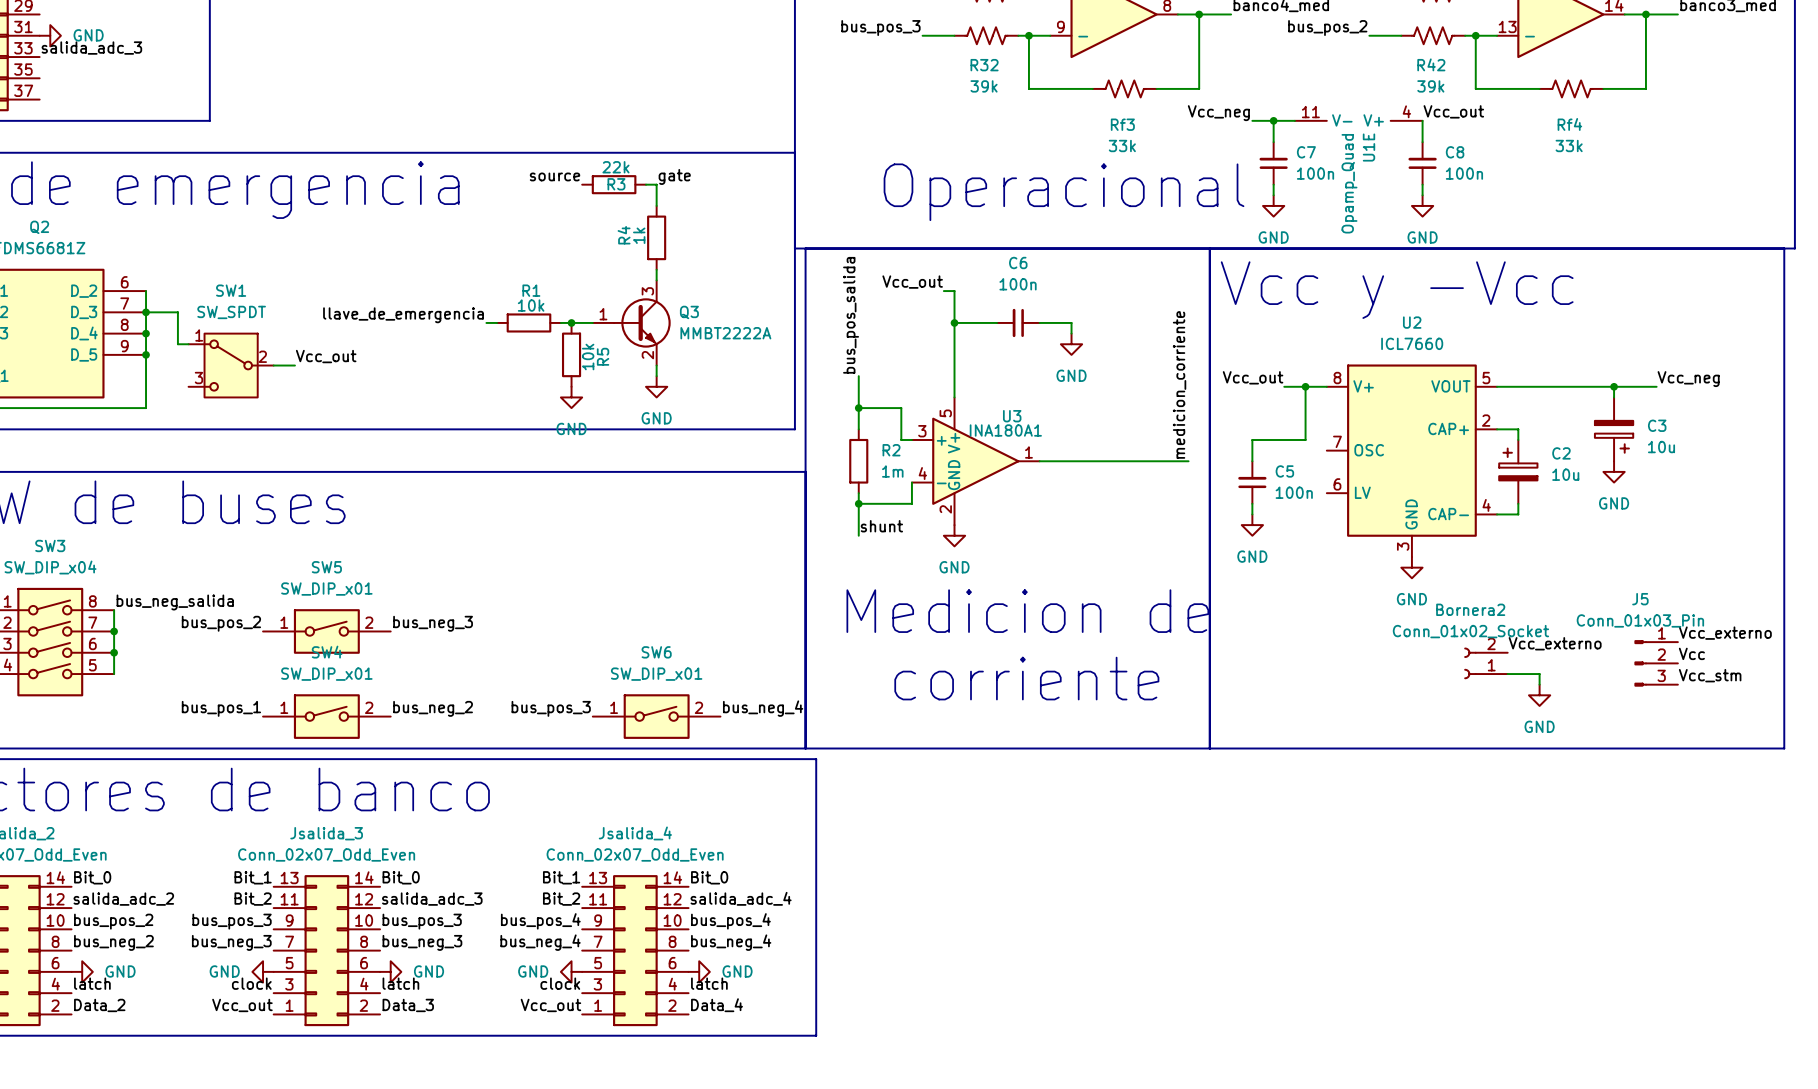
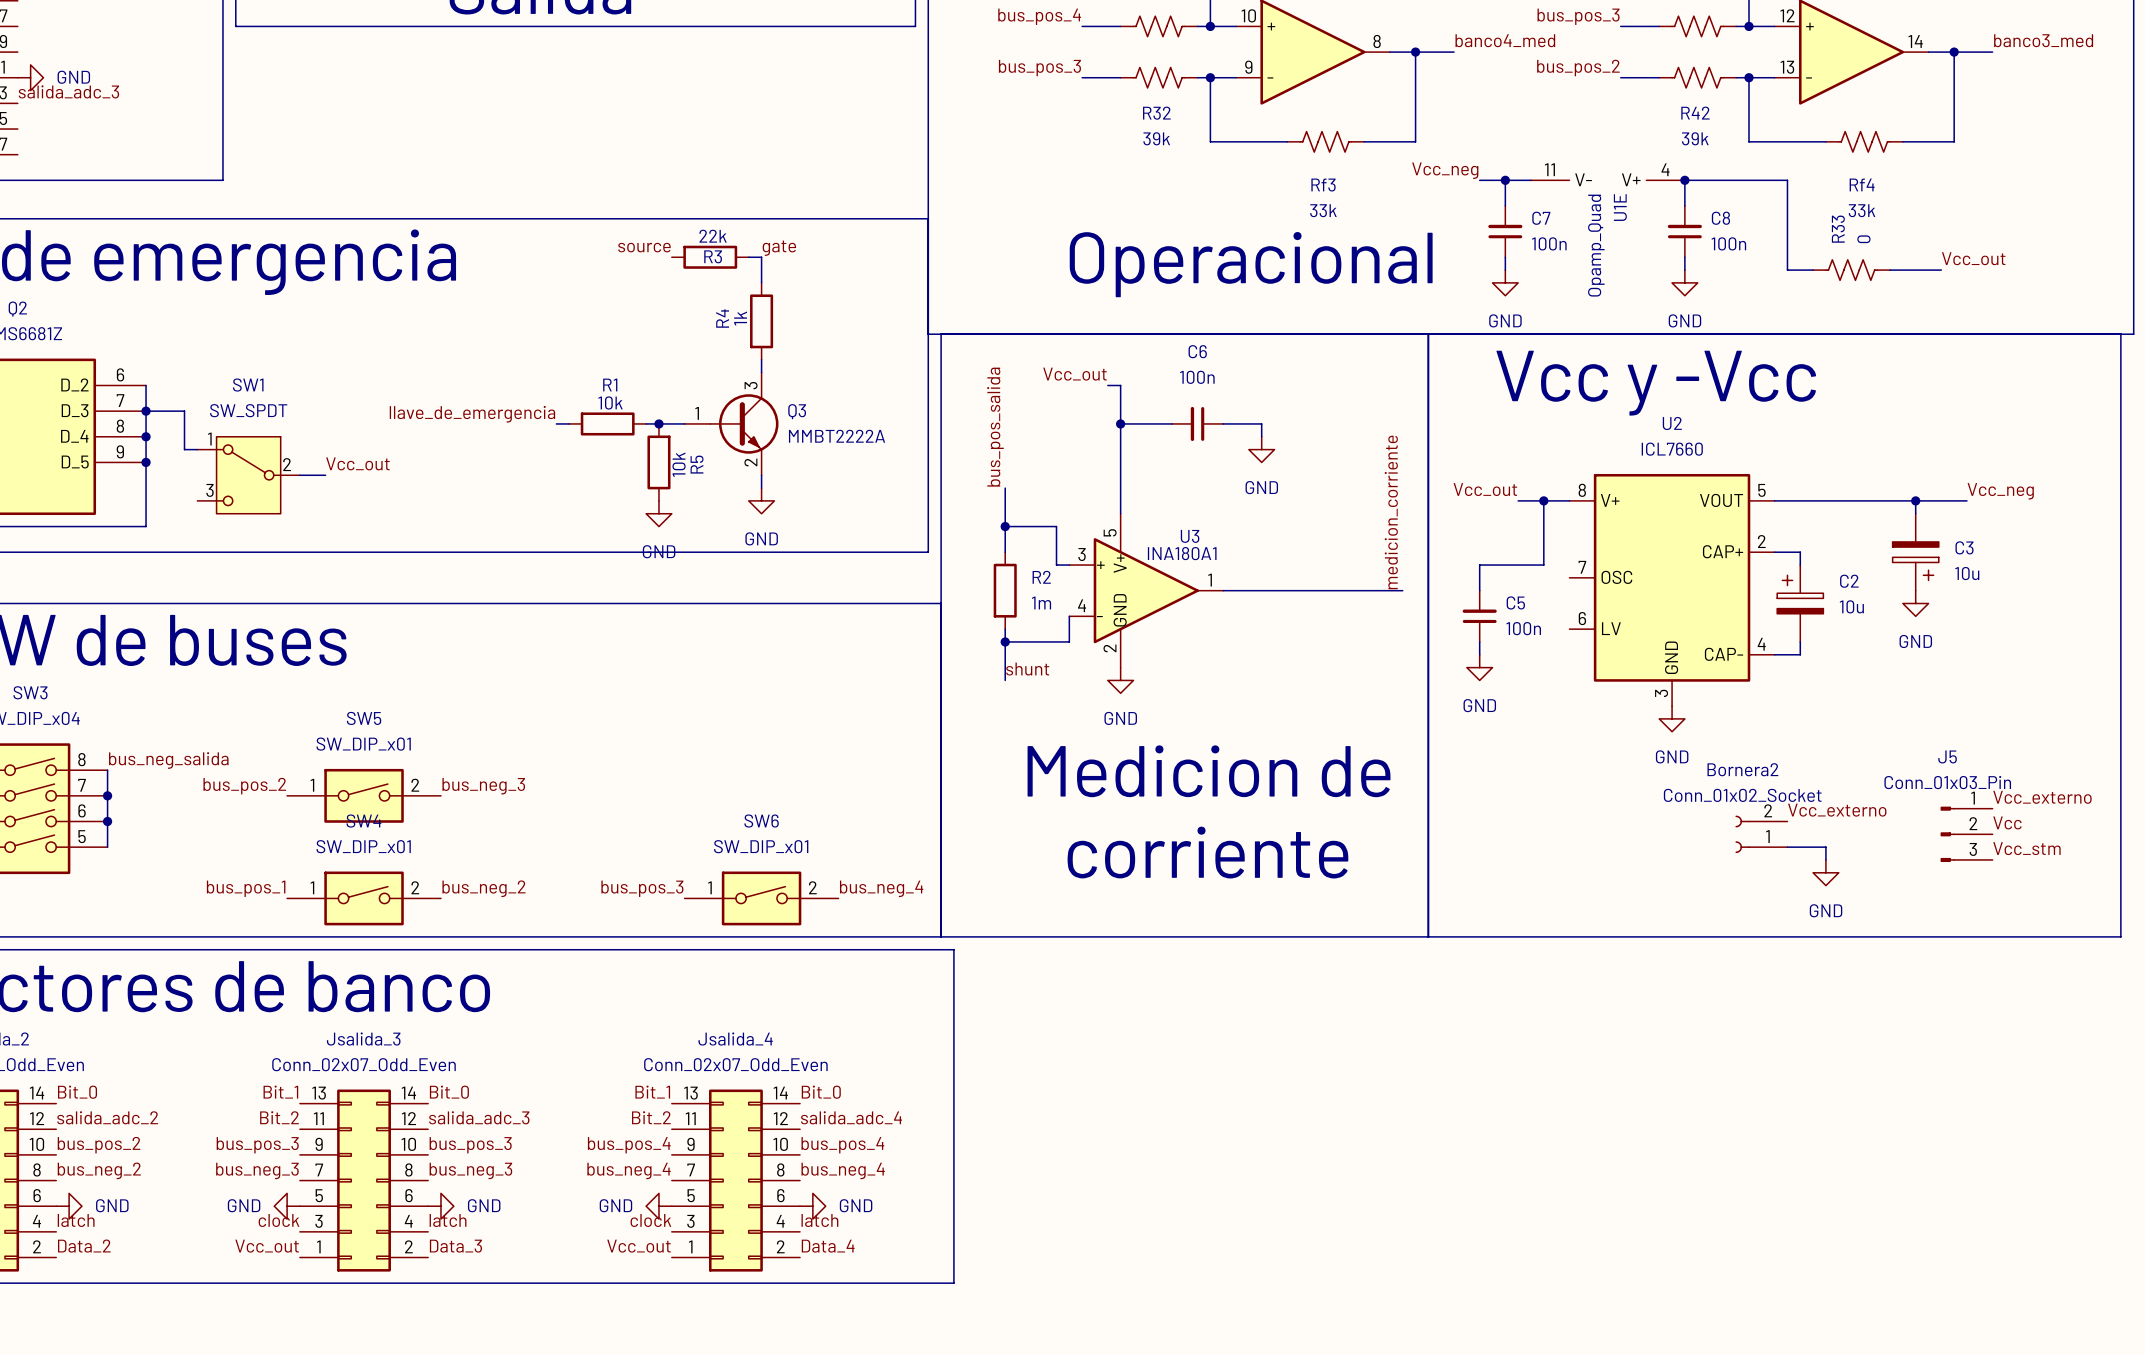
label: Vcc_out (1453, 111) -> none
wire: none -> (1684, 180) (1787, 180) (1787, 270) (1813, 270)
junction: none -> (1684, 180)
label: none -> Vcc_out (1973, 258)
R33: none -> 0 (1851, 270)
wire: none -> (1890, 270) (1941, 270)

